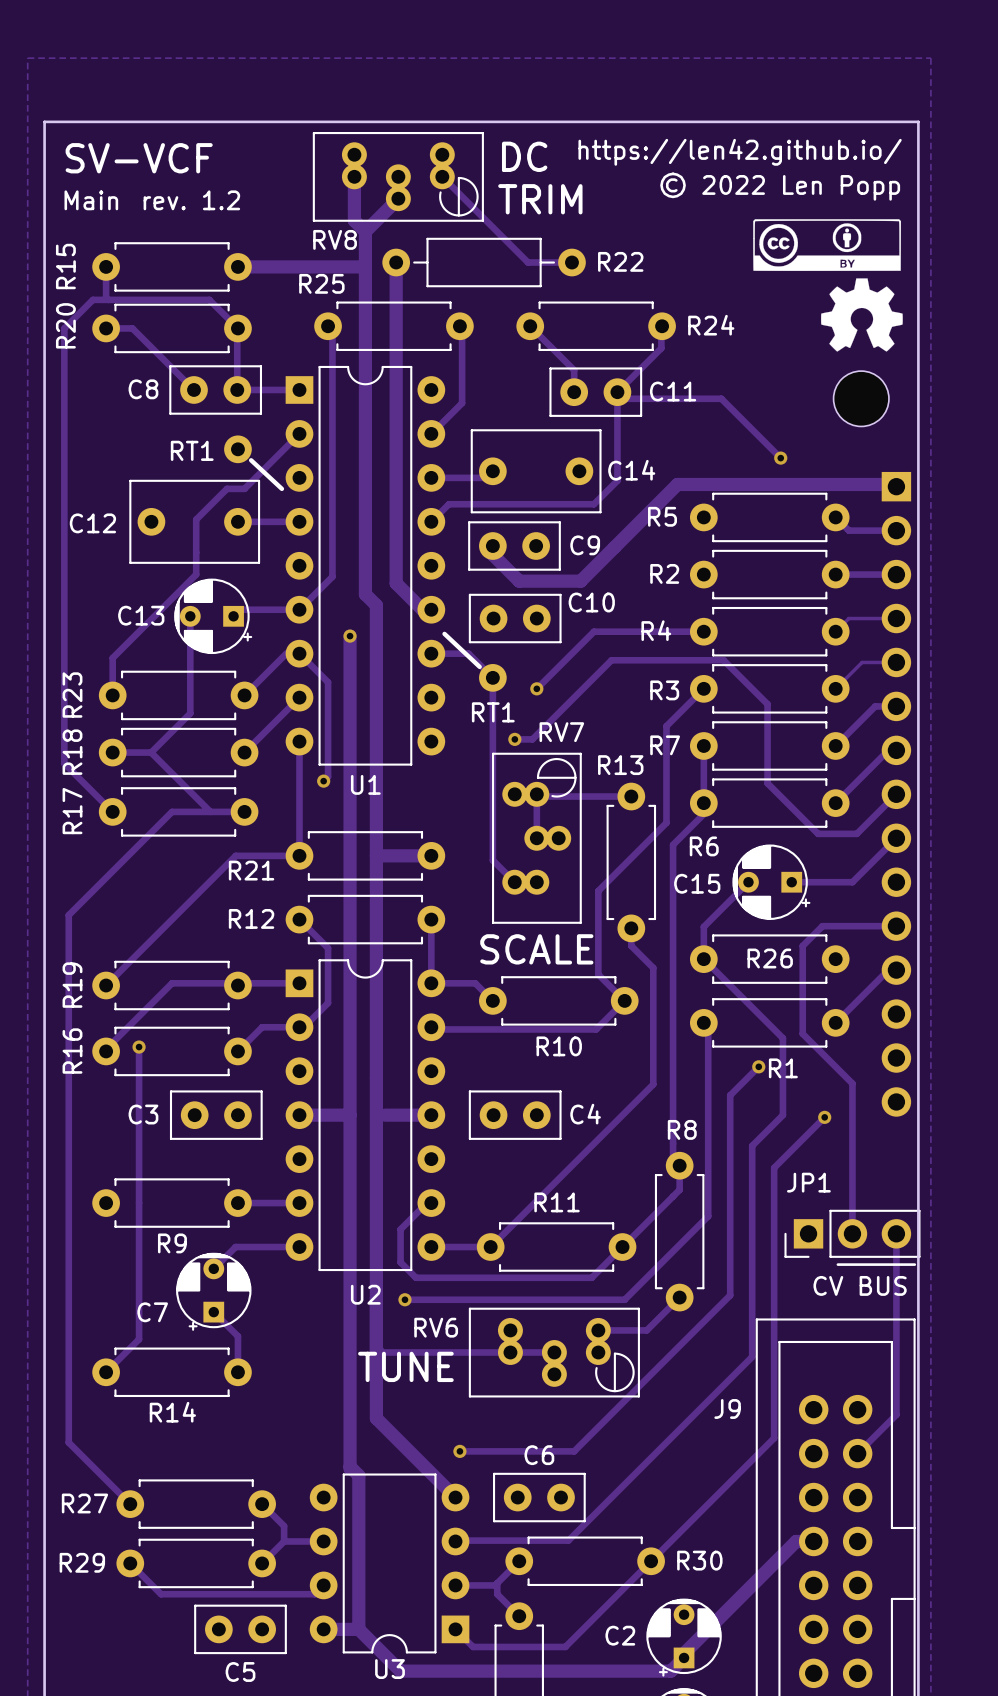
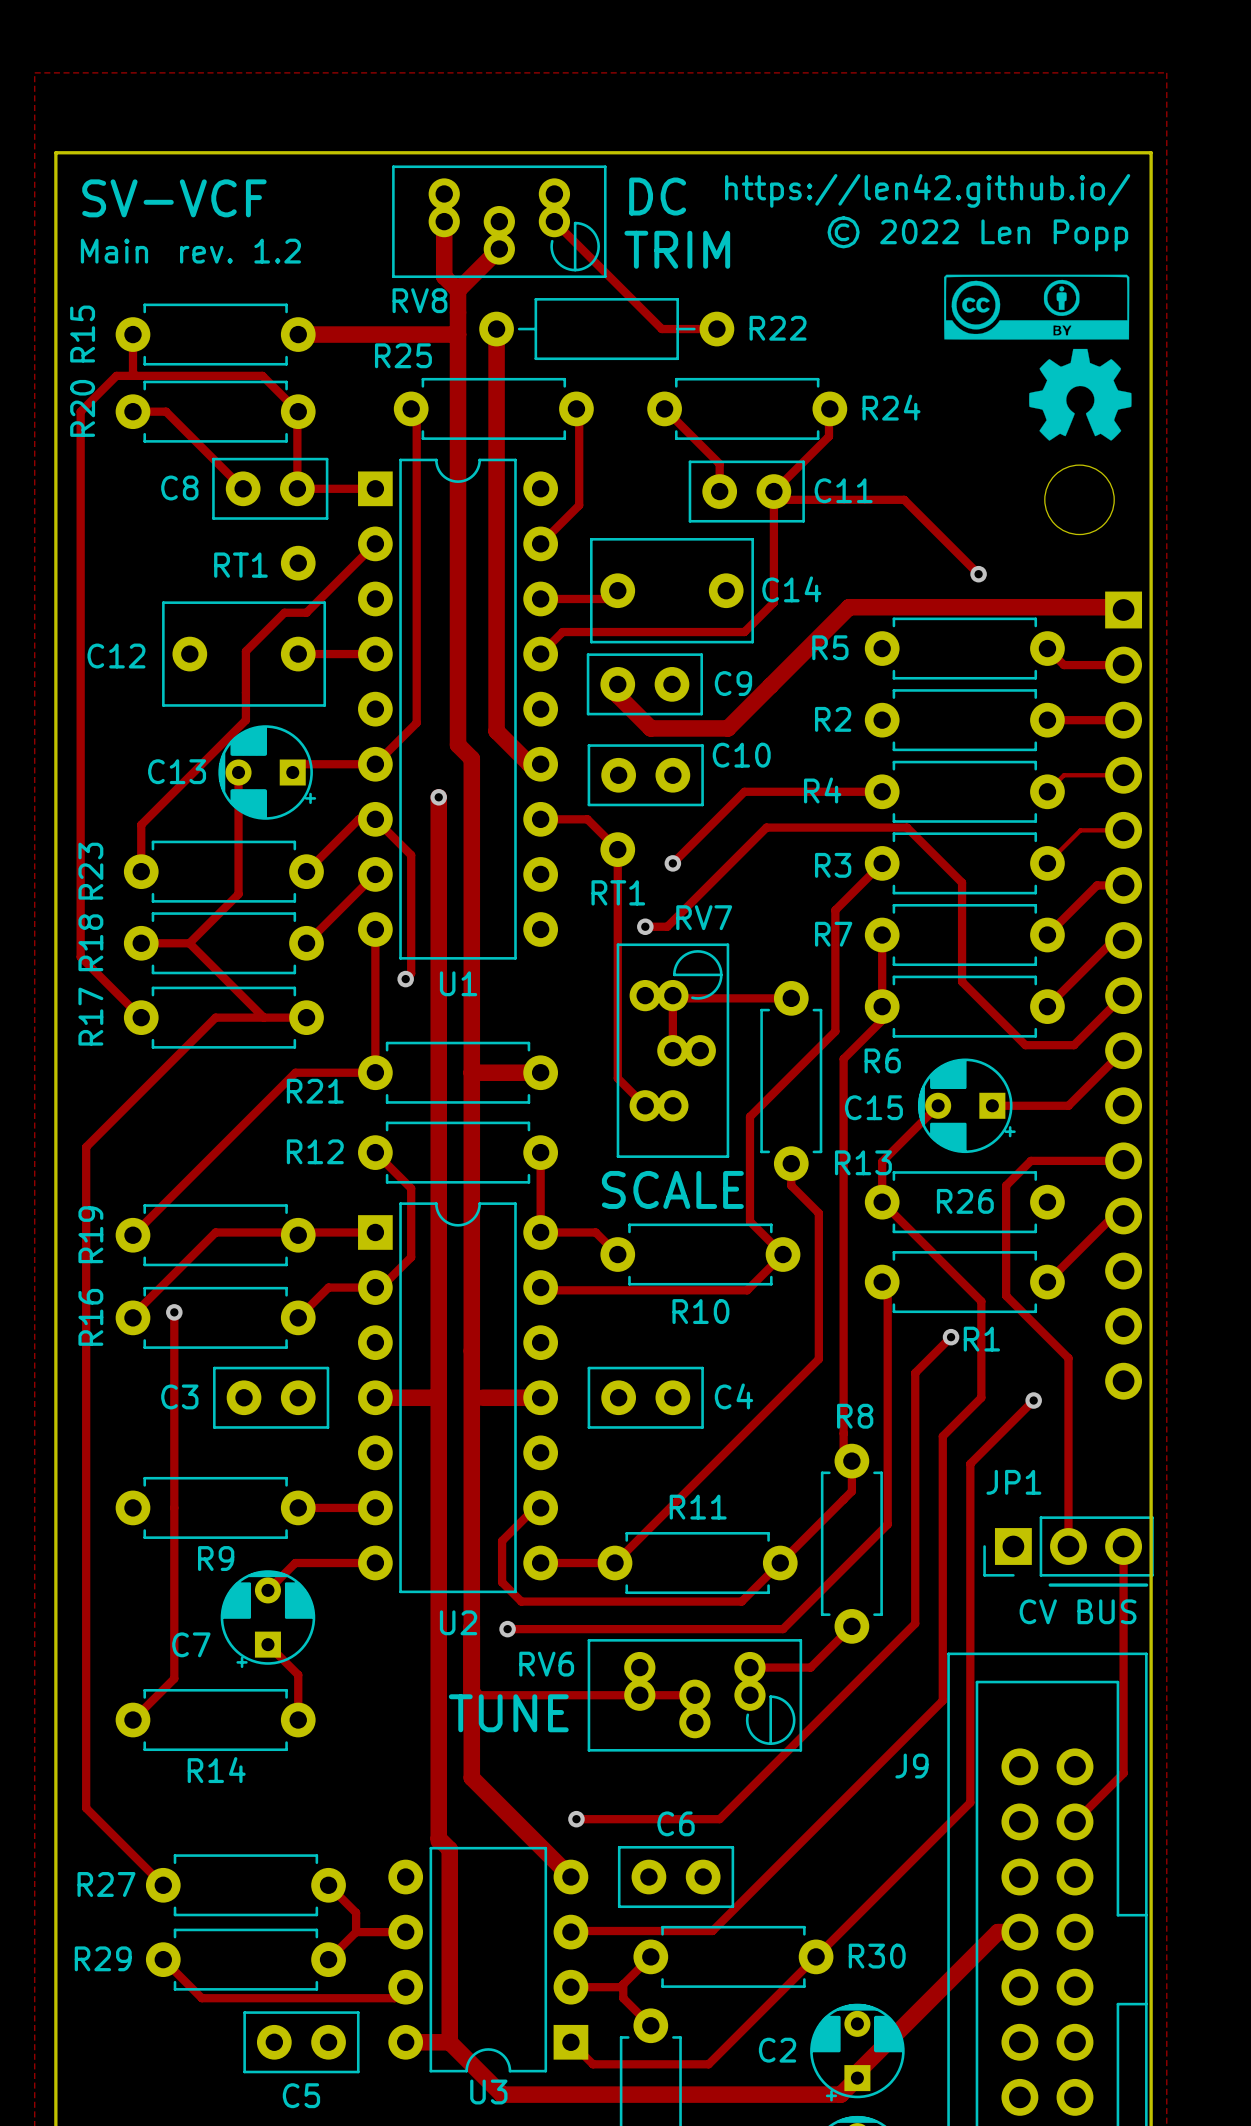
line: (251, 460) (281, 488) -> none
line: (444, 633) (479, 666) -> none
R13 name position: R13 (620, 765) -> R13 (863, 1162)

